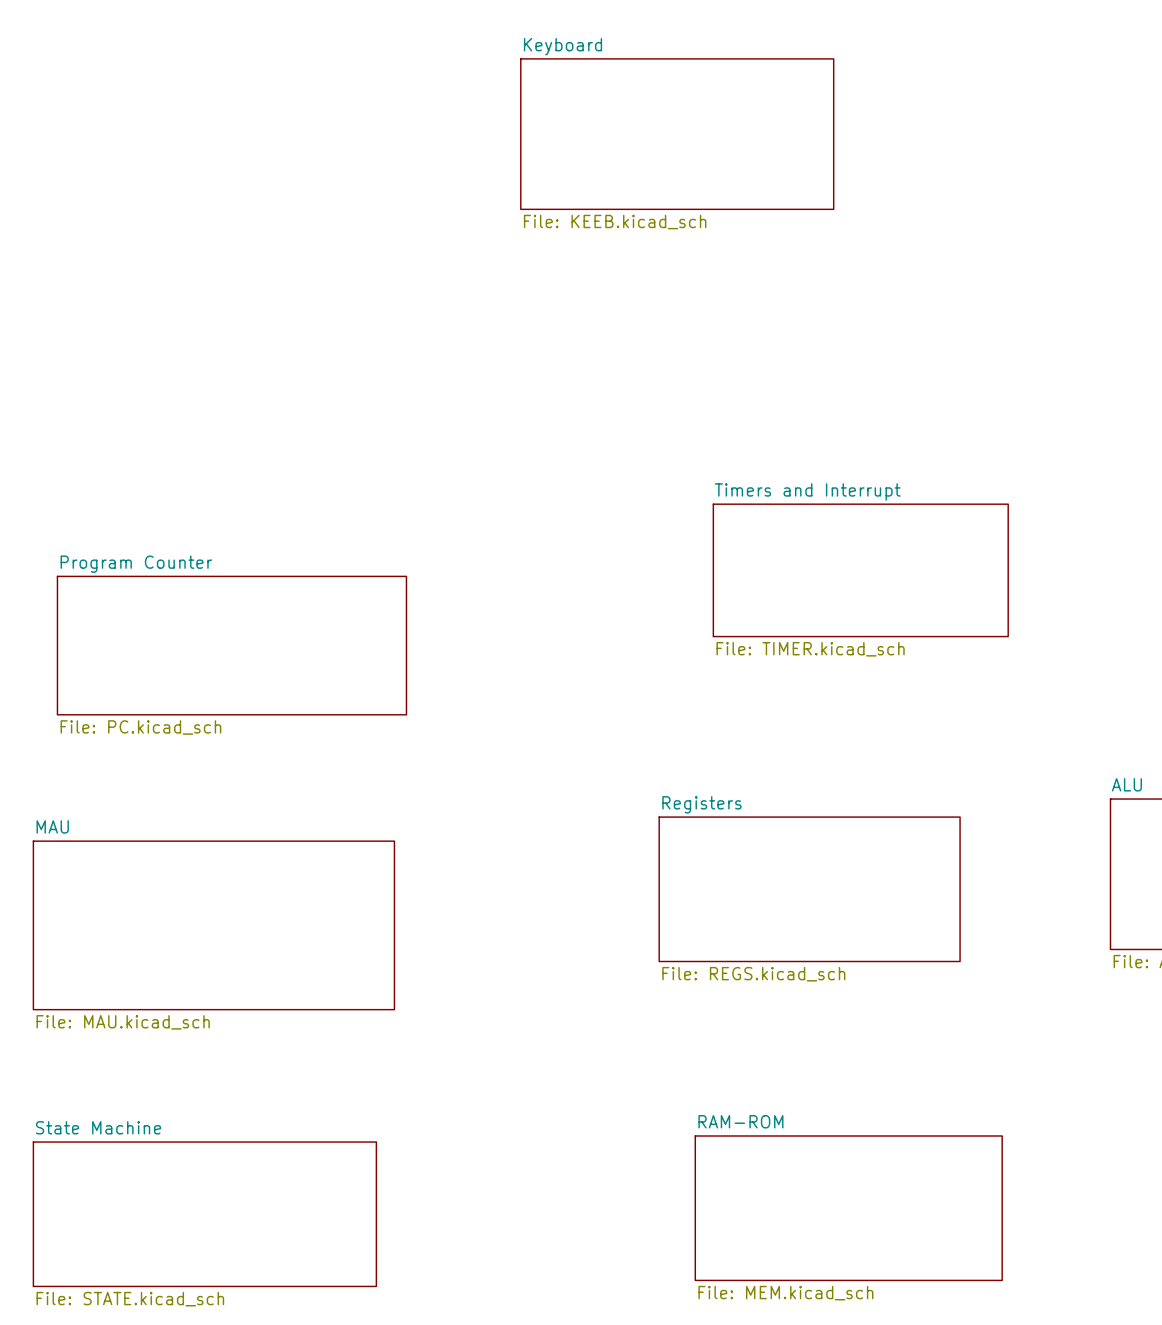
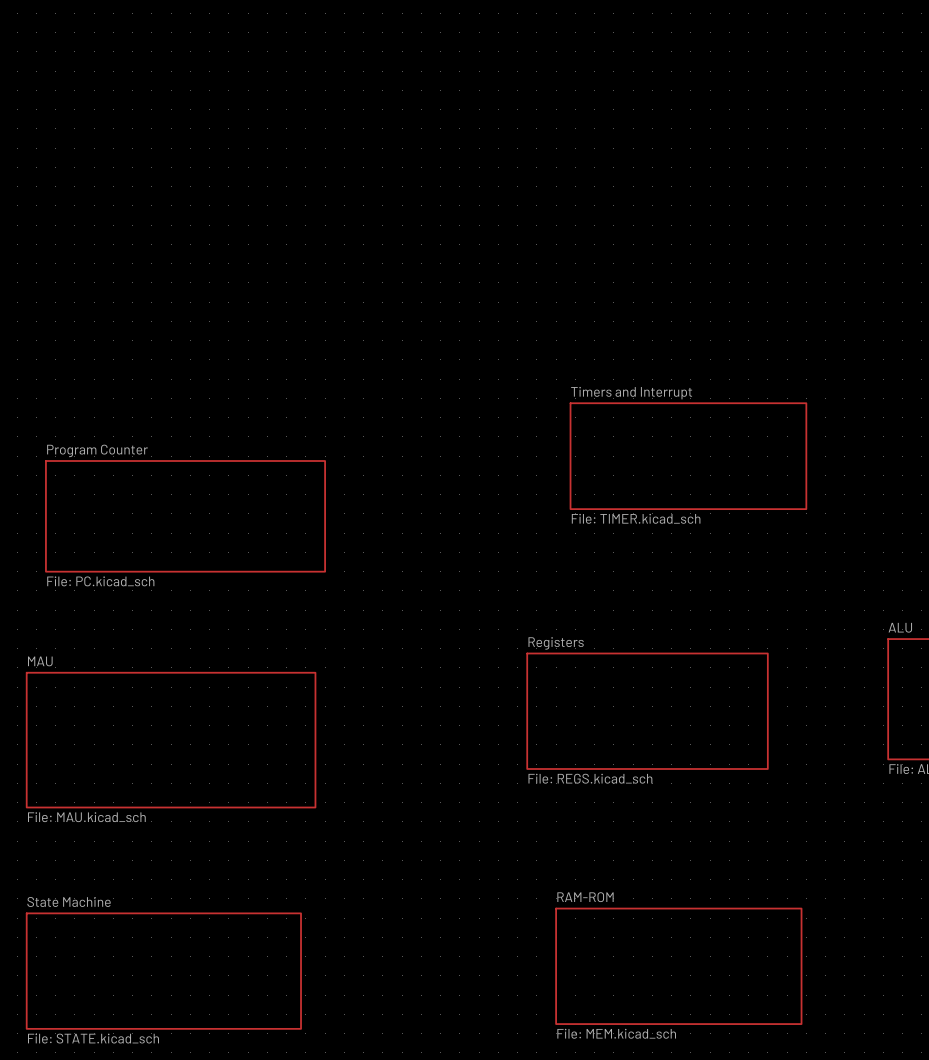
sheet Keyboard: File: KEEB.kicad_sch (677, 134) -> none

